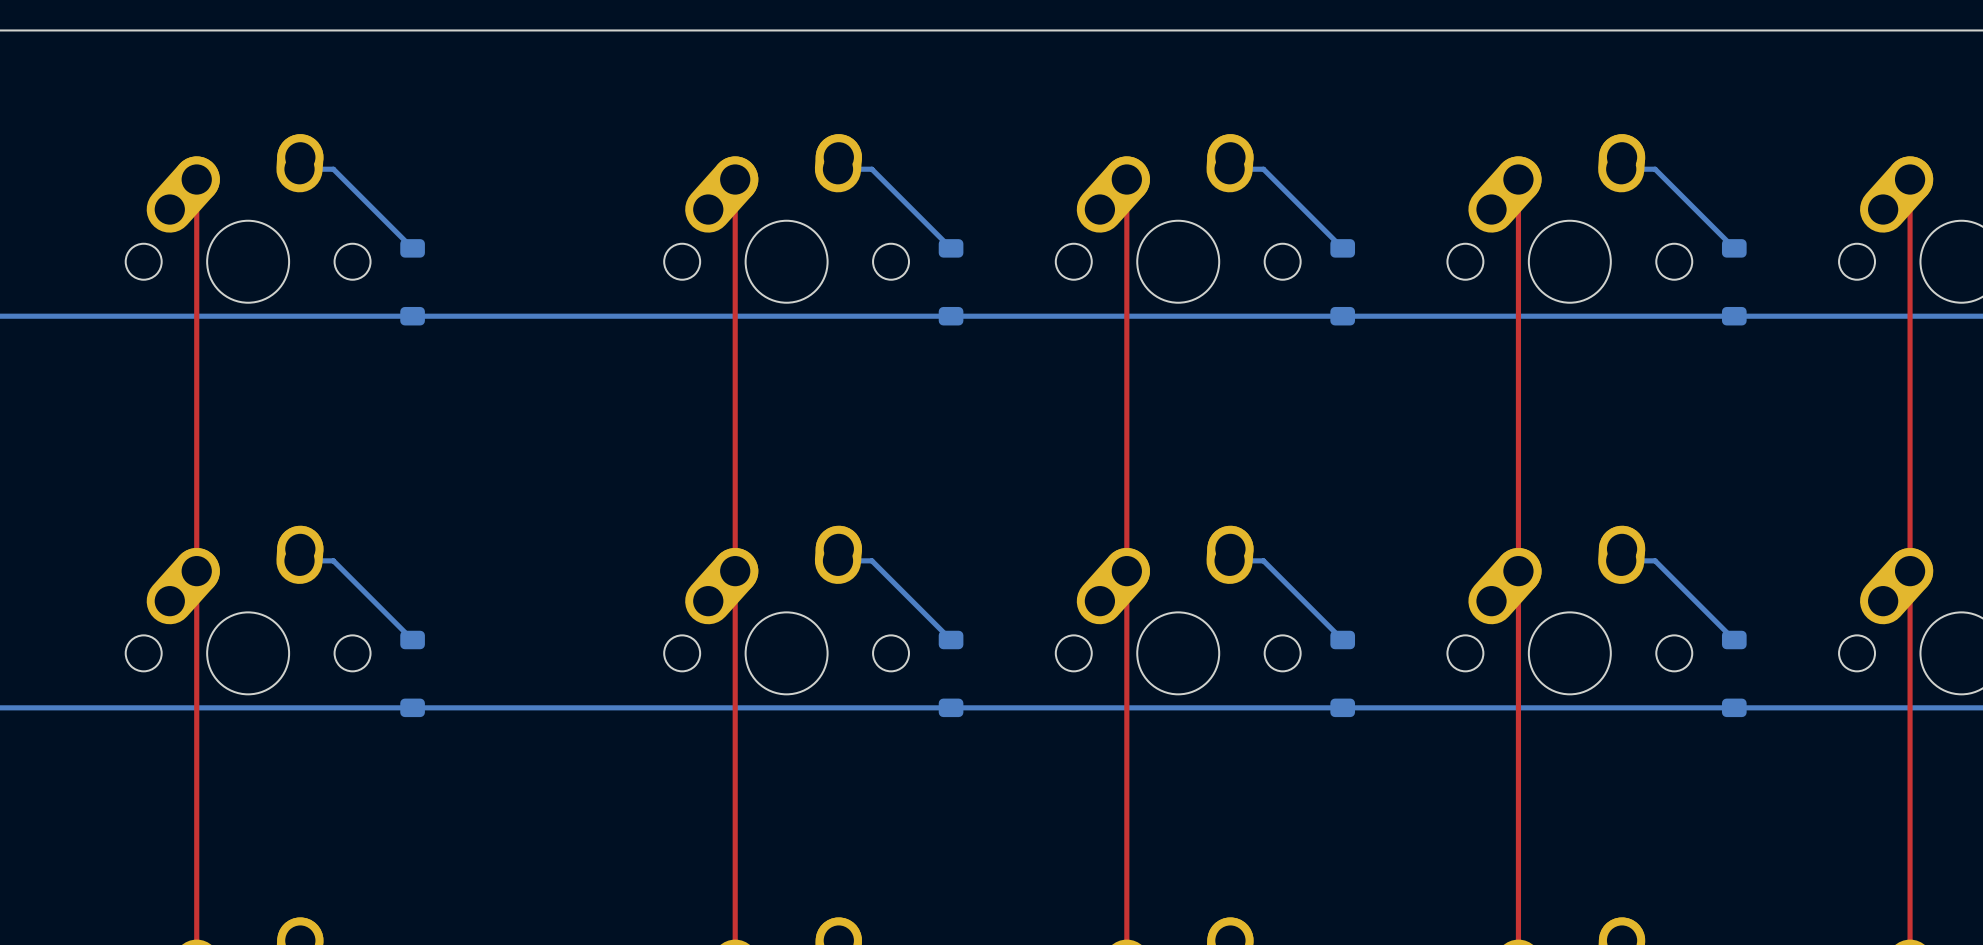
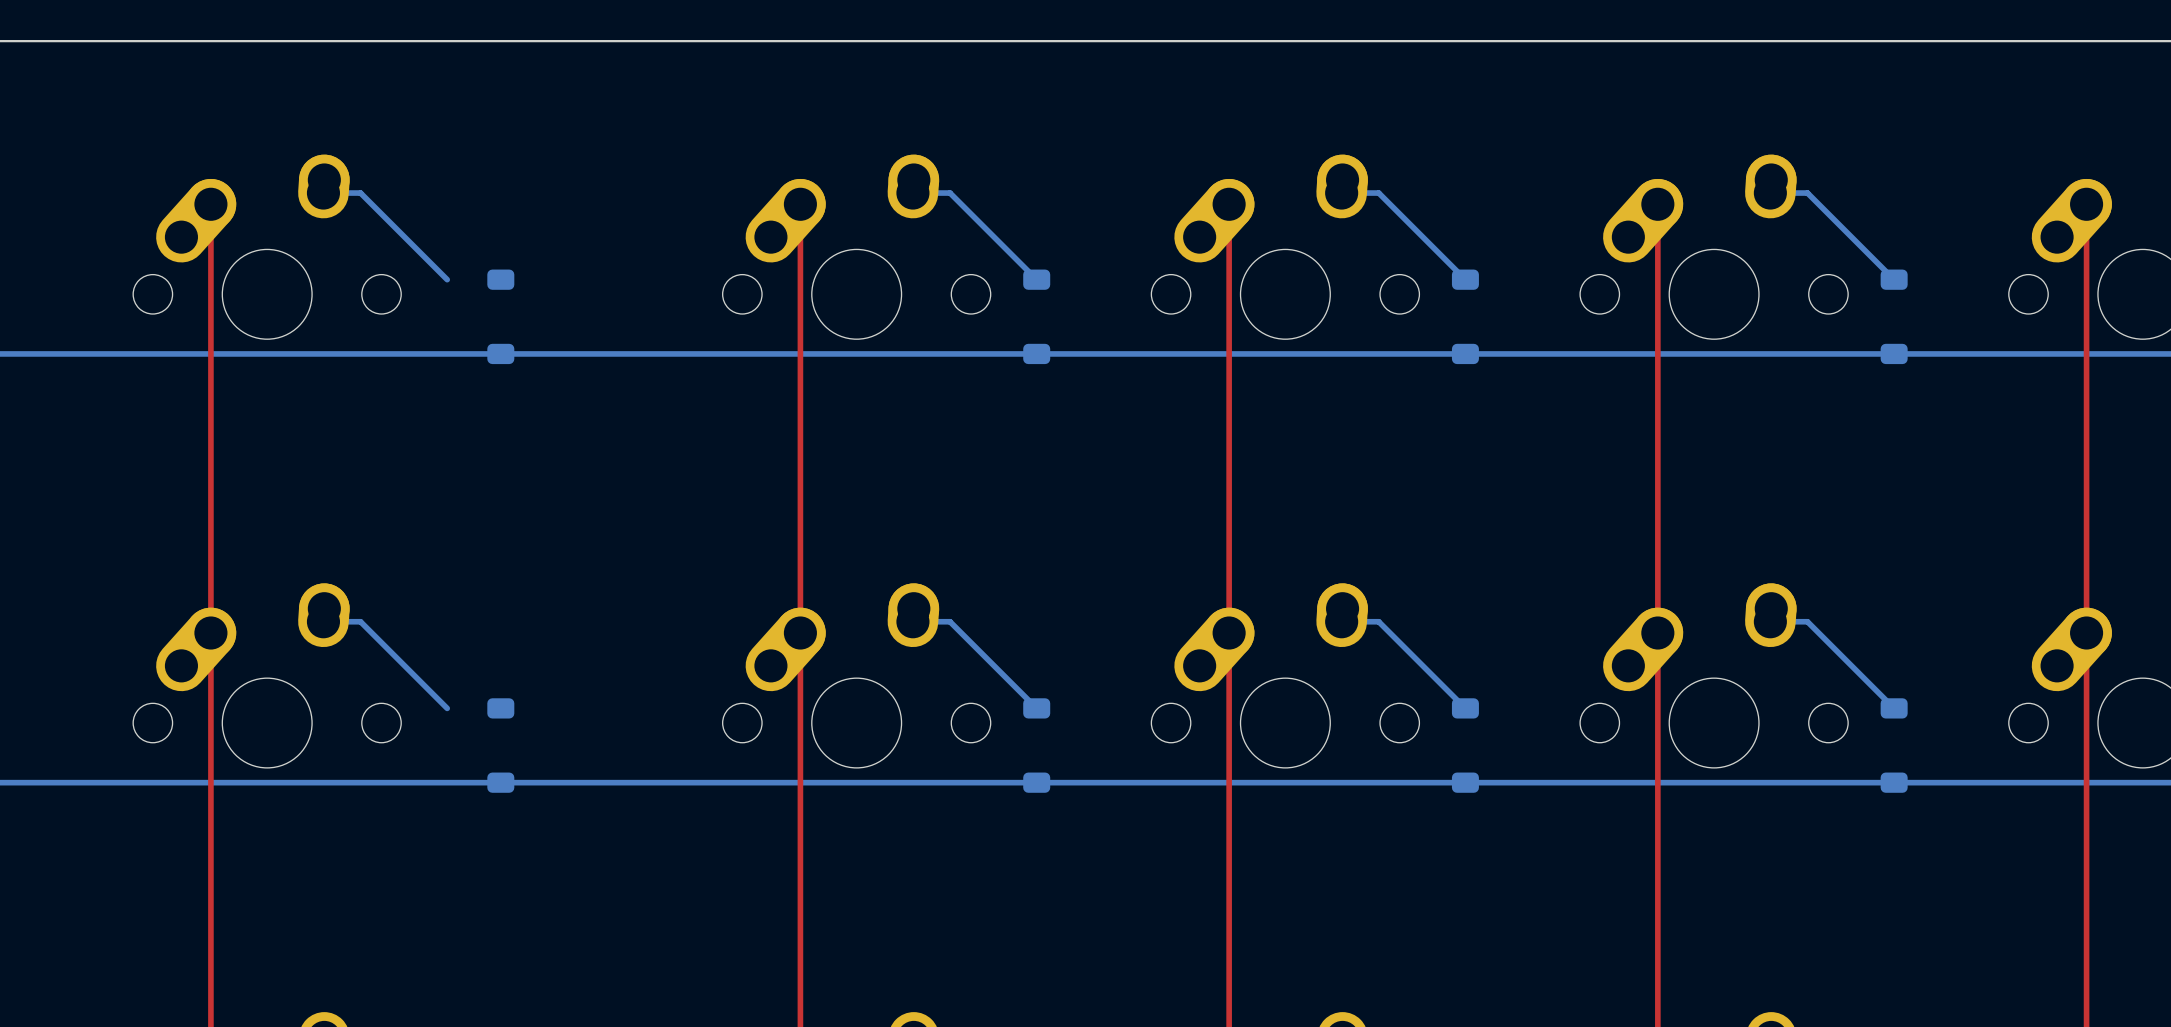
part position: (412, 282) -> (500, 316)
part position: (412, 673) -> (500, 745)

